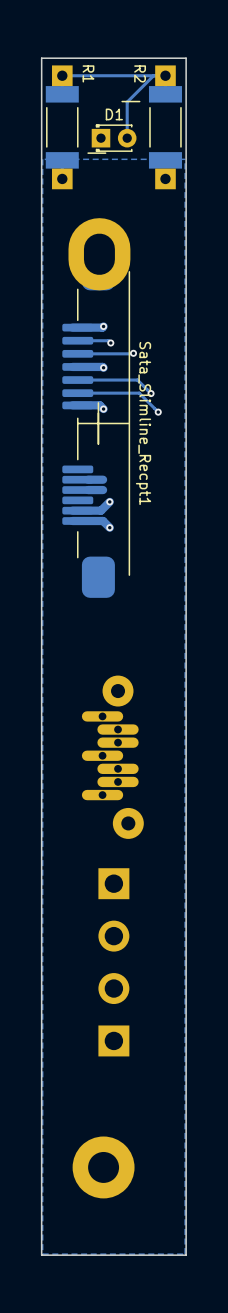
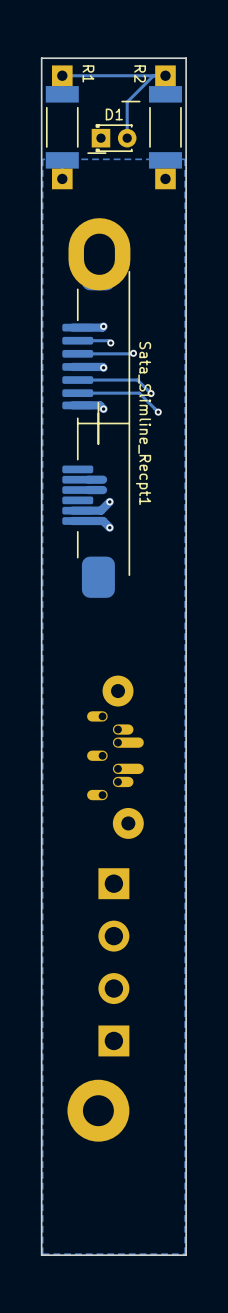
part footprint: [81, 675, 144, 839] -> [87, 675, 144, 839]
part position: (103, 1167) -> (98, 1110)

